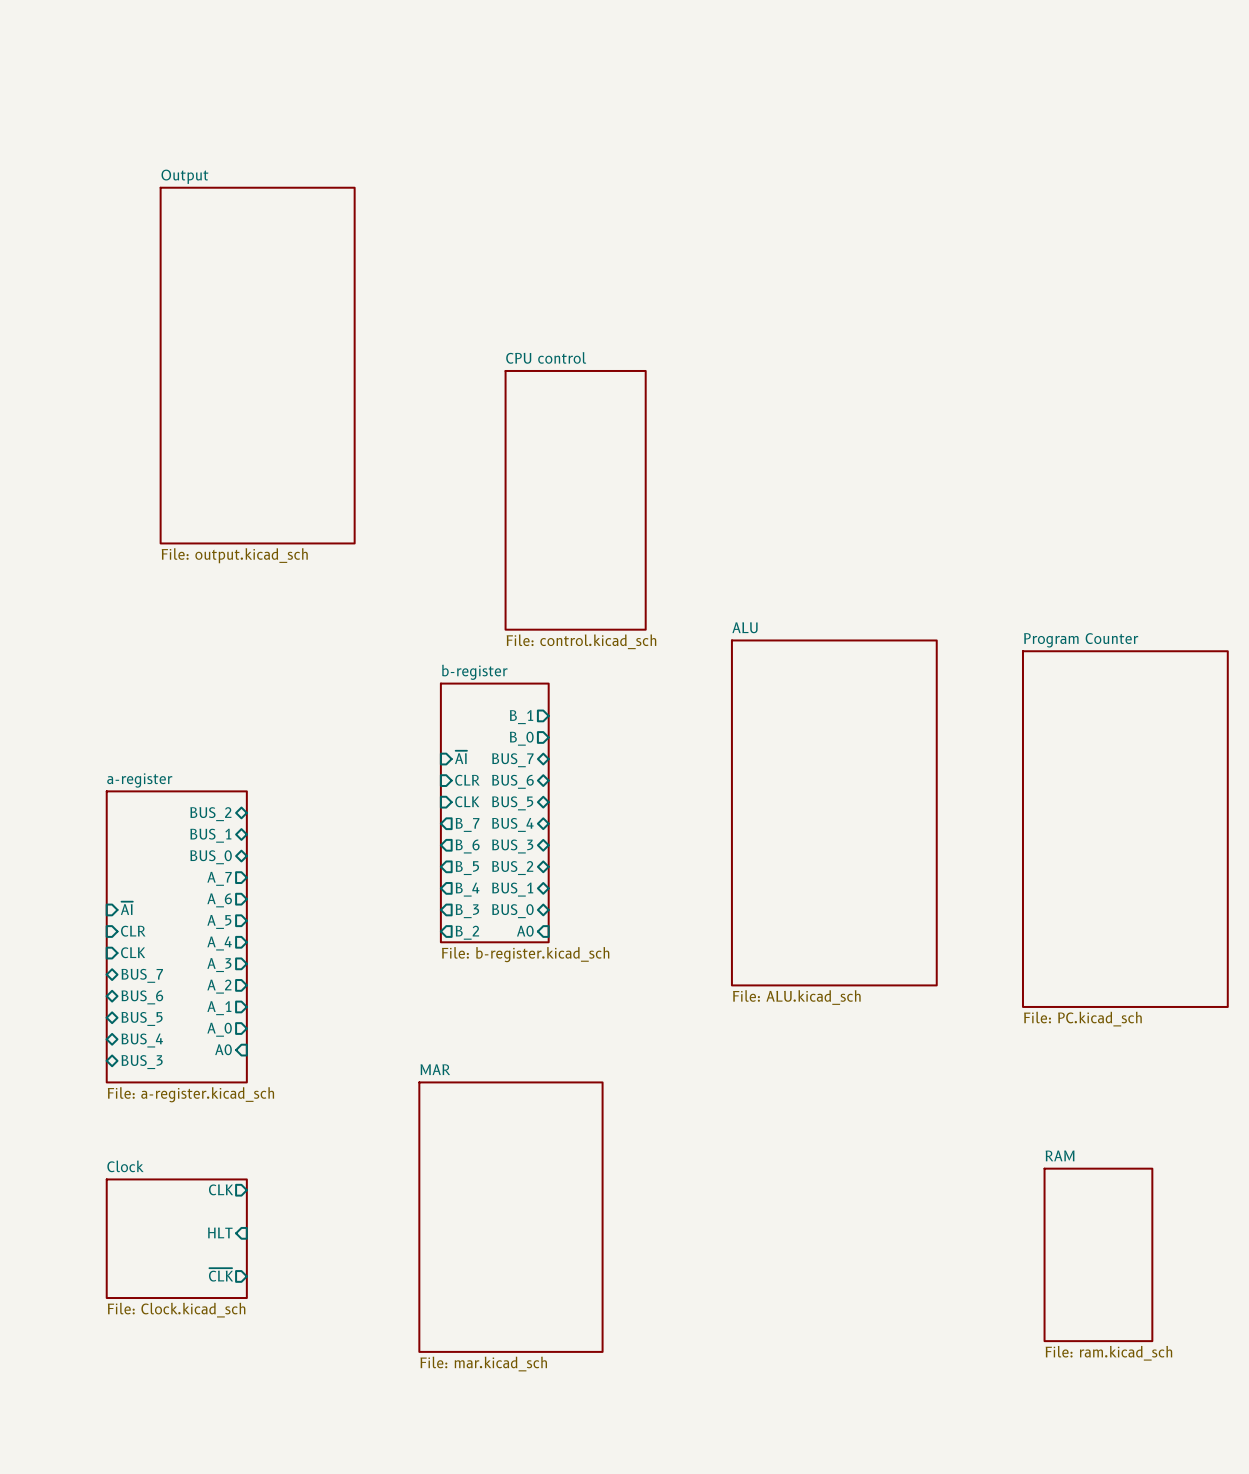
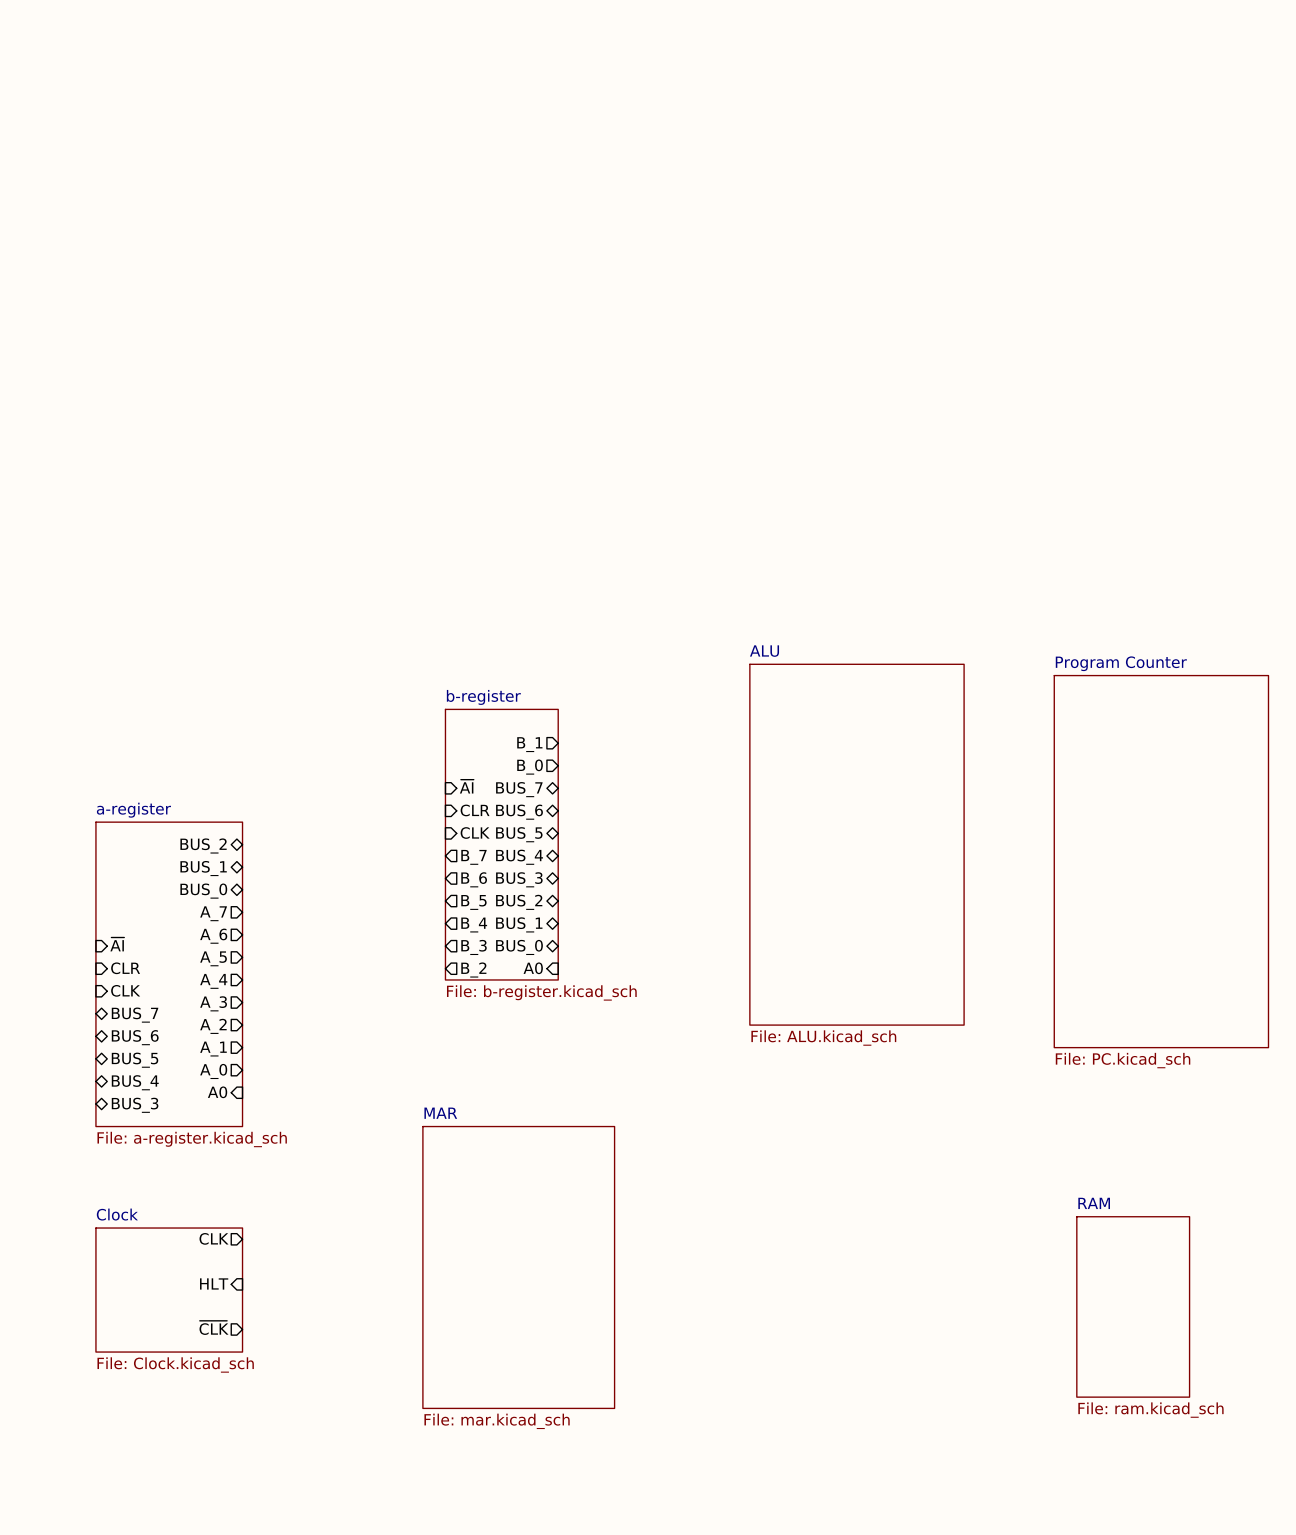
sheet Output: File: output.kicad_sch (257, 365) -> none
sheet CPU control: File: control.kicad_sch (575, 500) -> none

